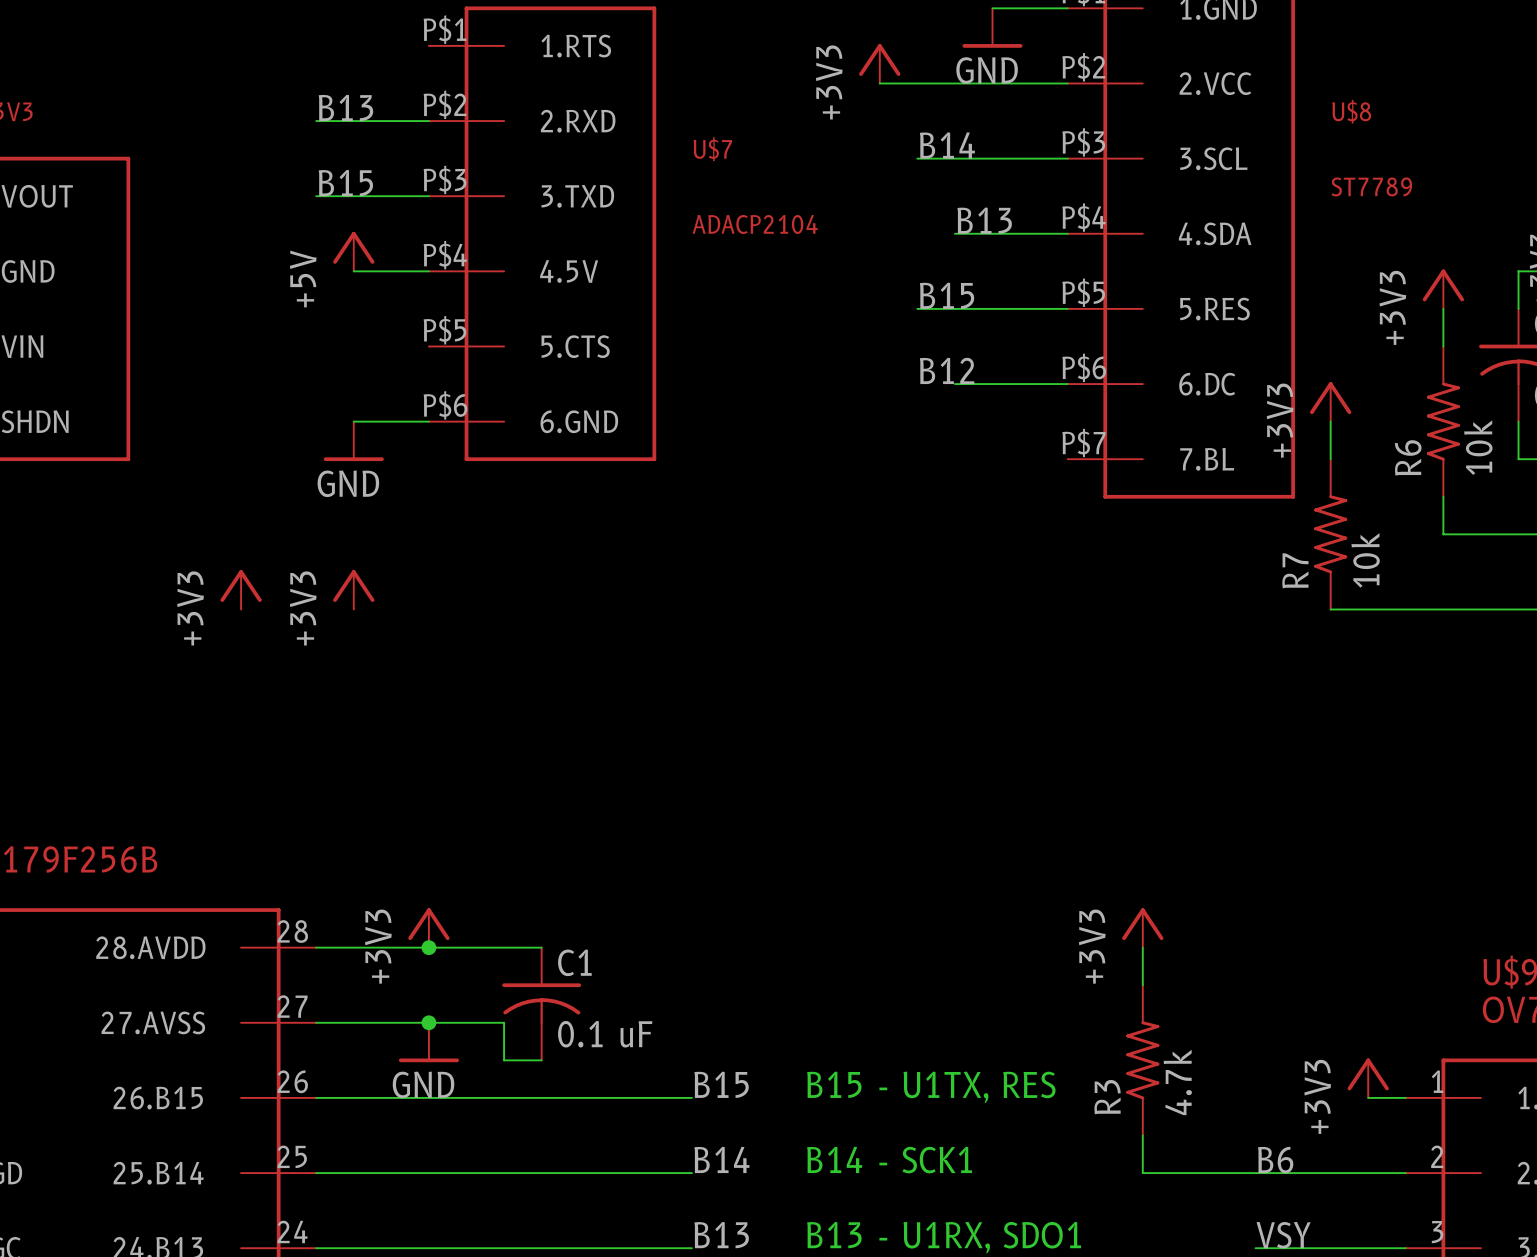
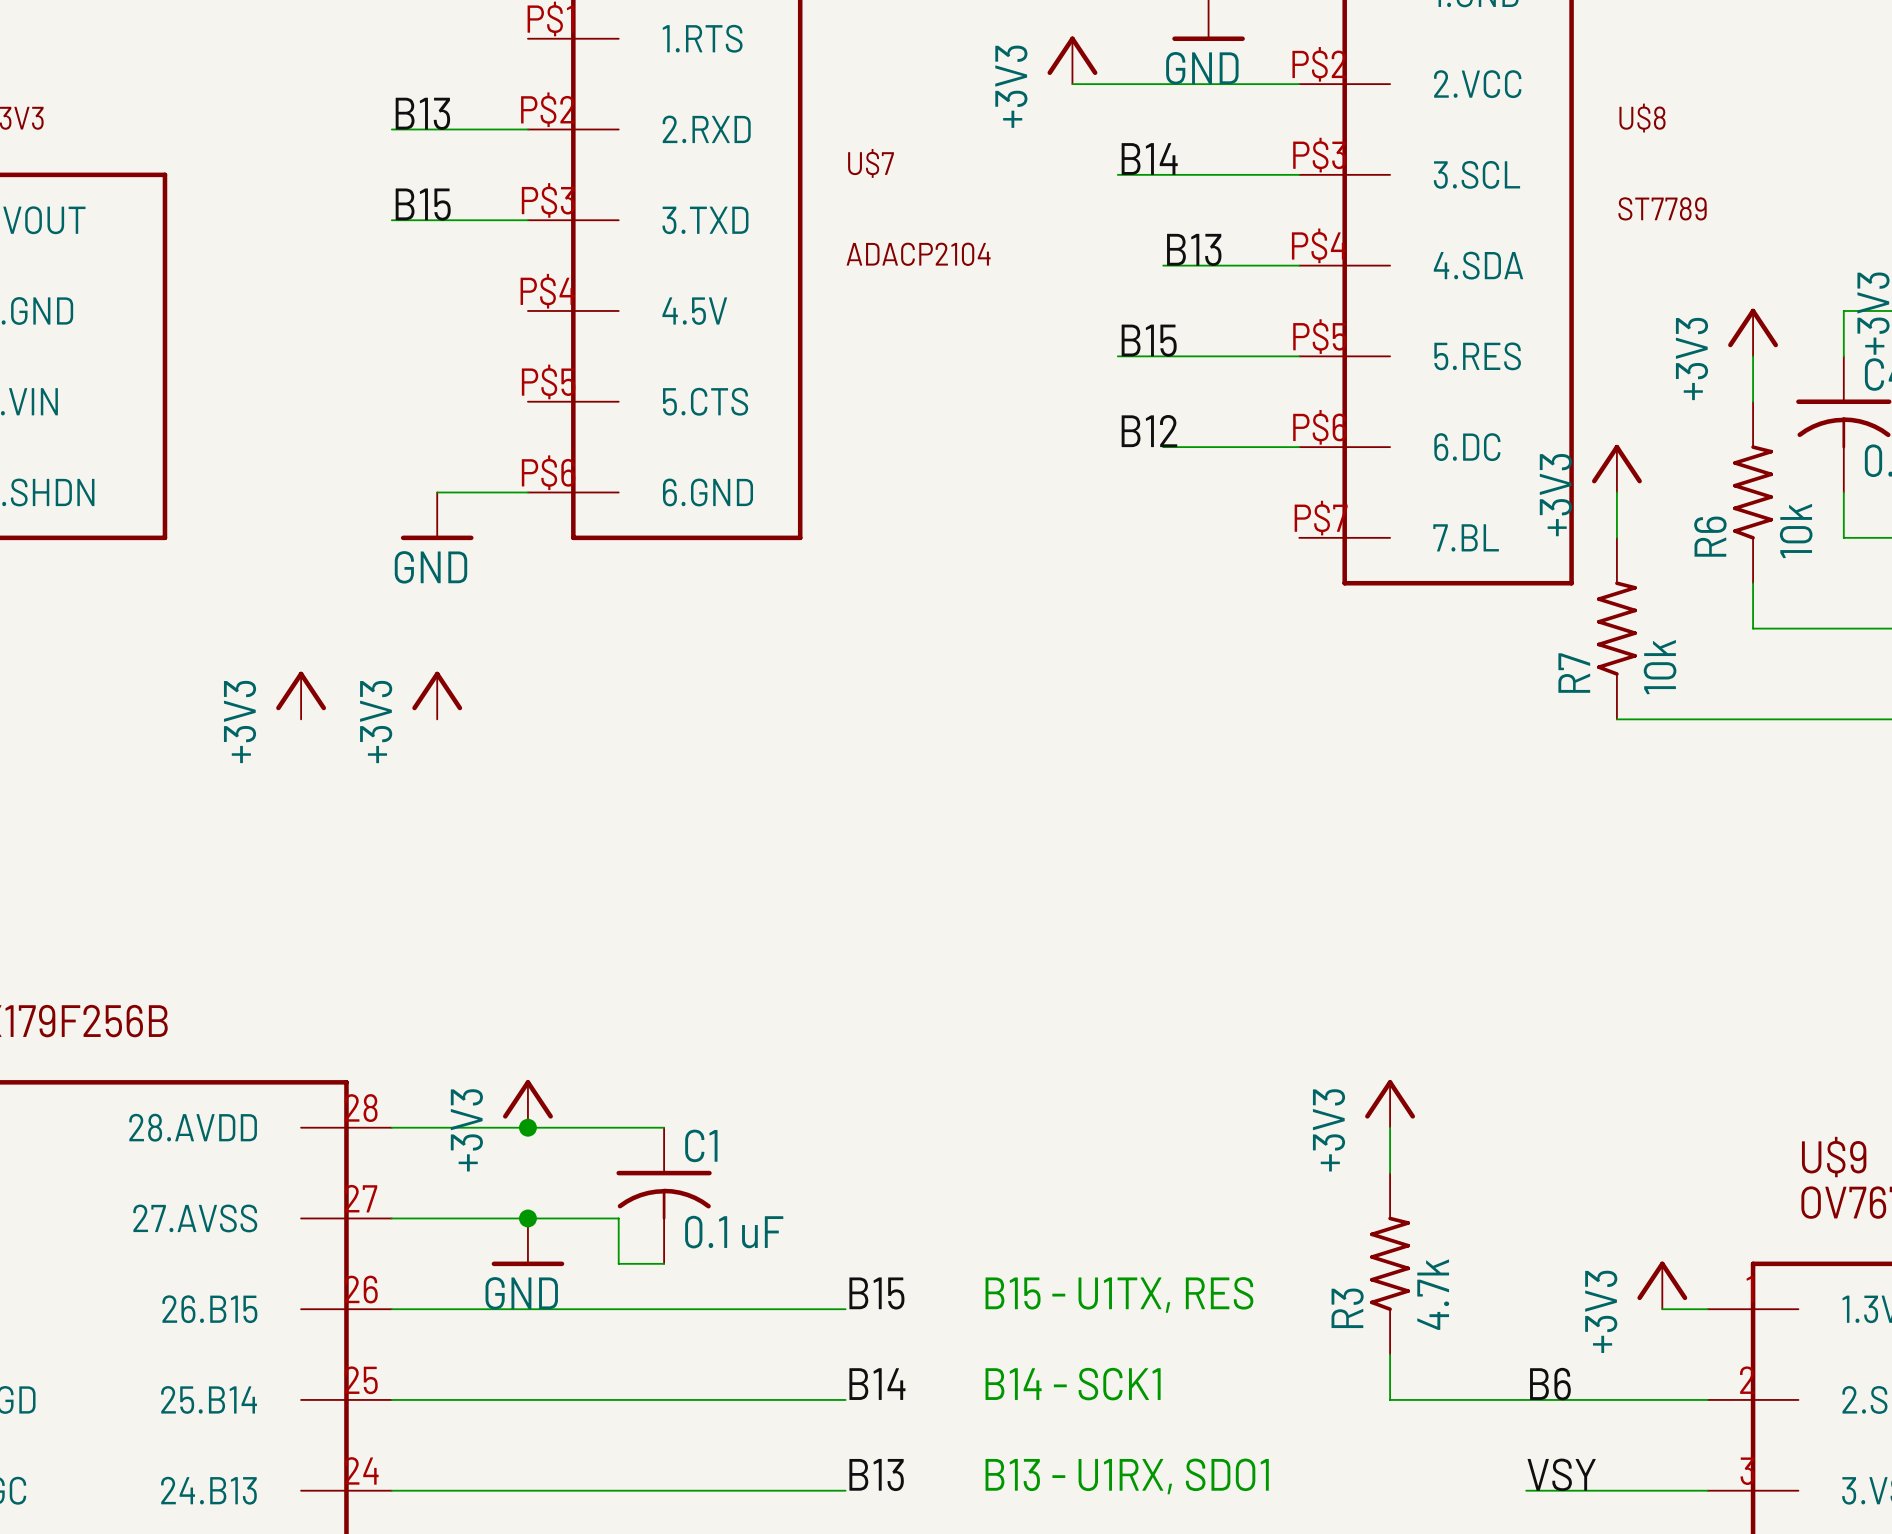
power symbol: +5V (353, 251) -> none
wire: (353, 271) (428, 271) -> none

